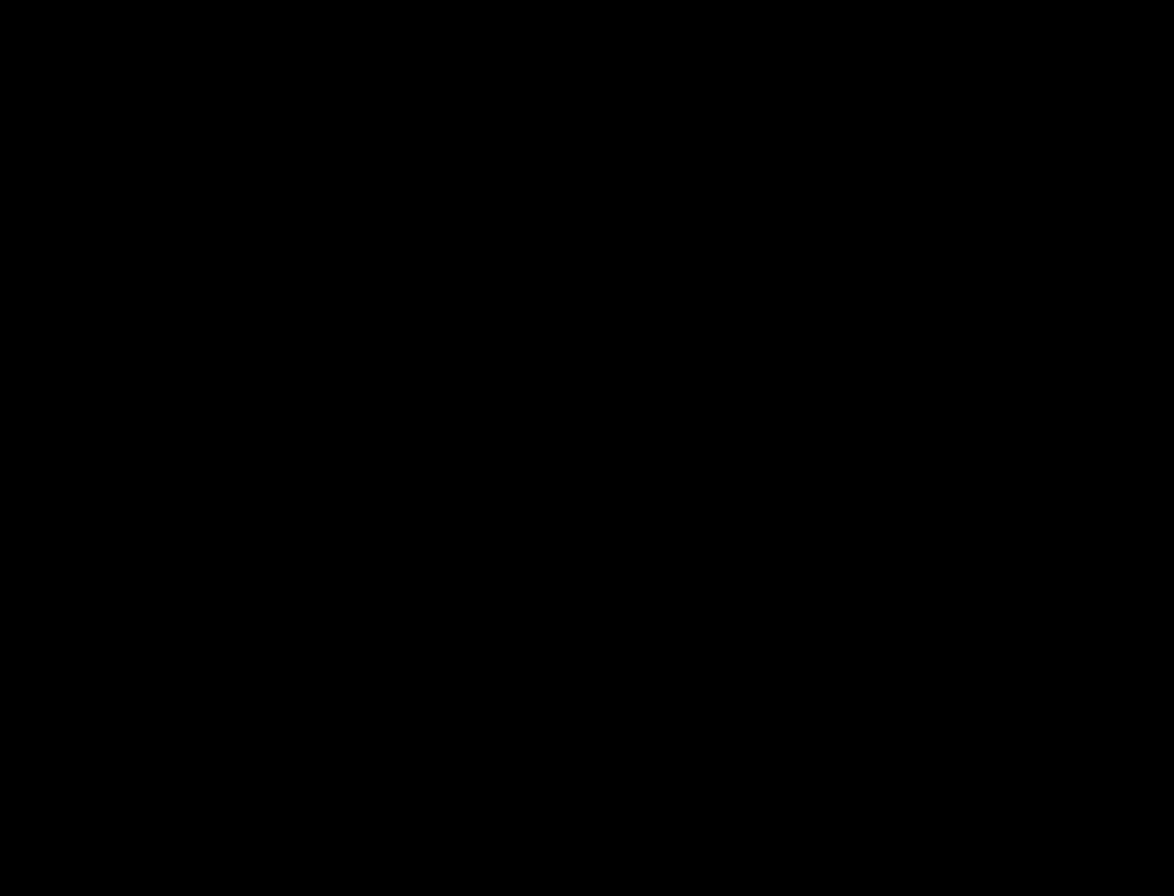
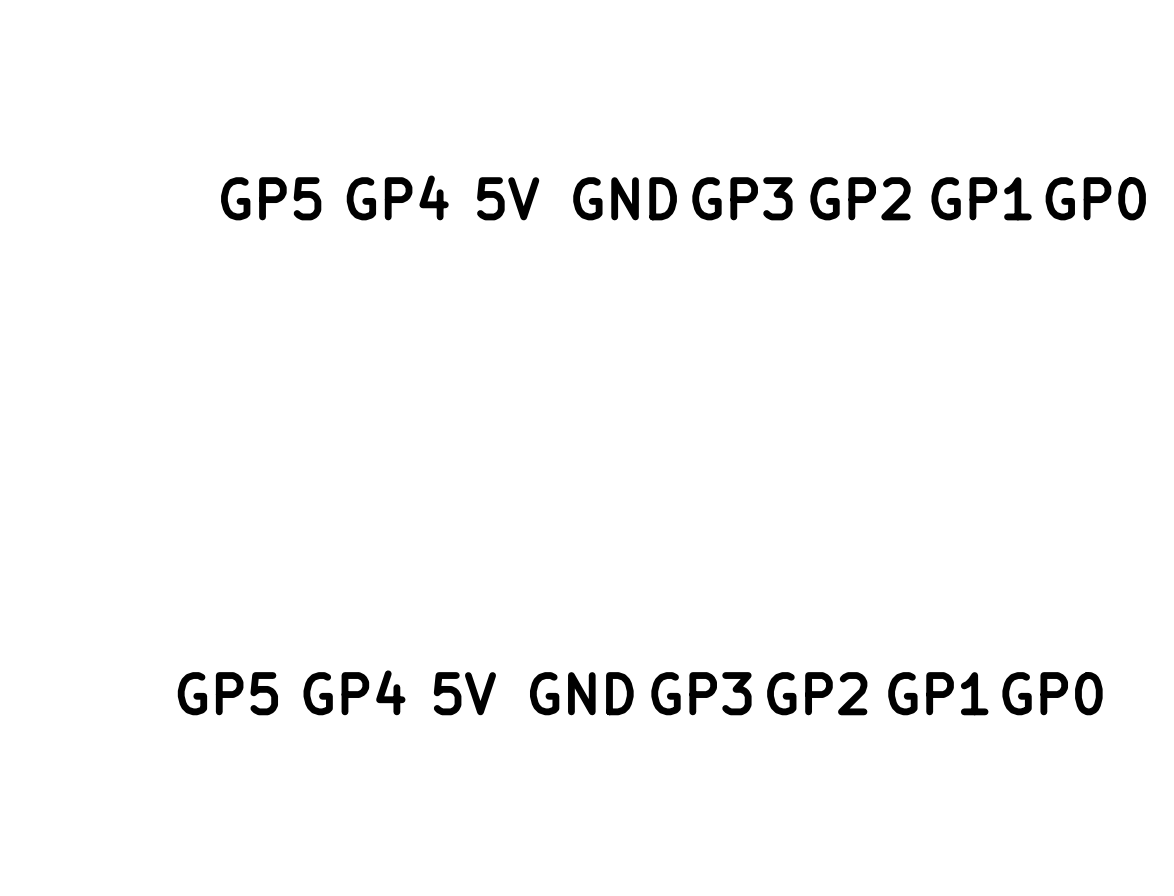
text: none -> GP4 (397, 197)
text: none -> GP5 (271, 198)
text: none -> 5V (508, 198)
text: none -> GND (625, 198)
text: none -> GP3 (742, 198)
text: none -> GP2 (860, 198)
text: none -> GP1 (981, 198)
text: none -> GP0 (1095, 198)
text: none -> GP4 (354, 692)
text: none -> GP5 (227, 693)
text: none -> 5V (464, 693)
text: none -> GND (581, 693)
text: none -> GP3 (701, 693)
text: none -> GP2 (817, 693)
text: none -> GP1 (938, 693)
text: none -> GP0 (1052, 693)

